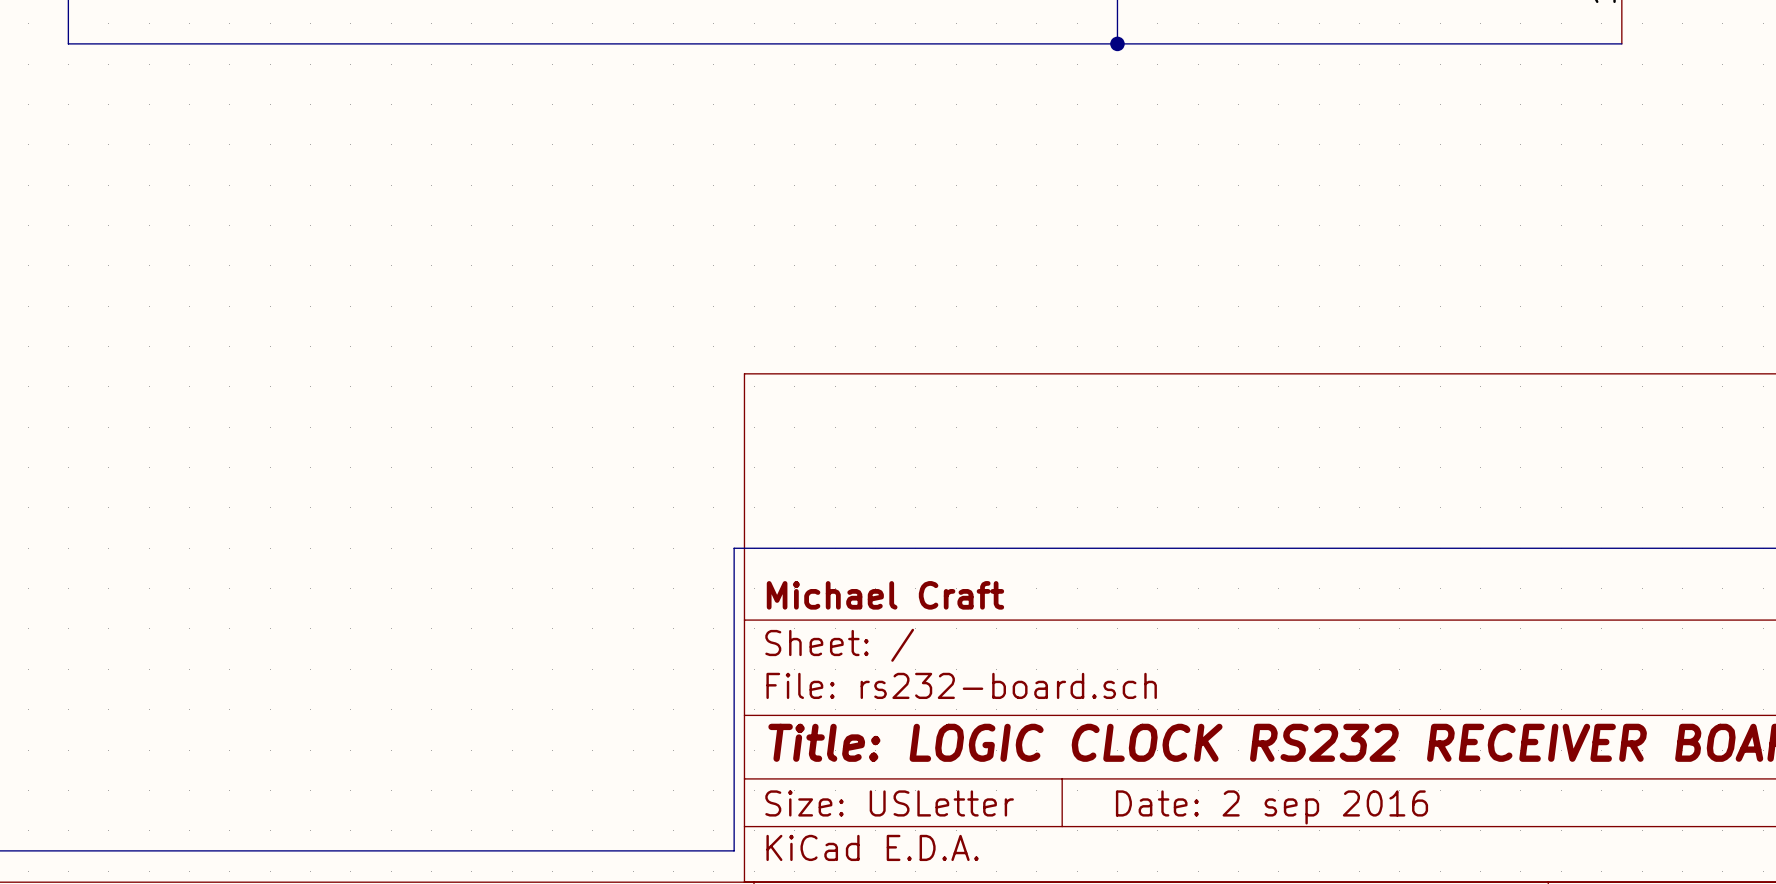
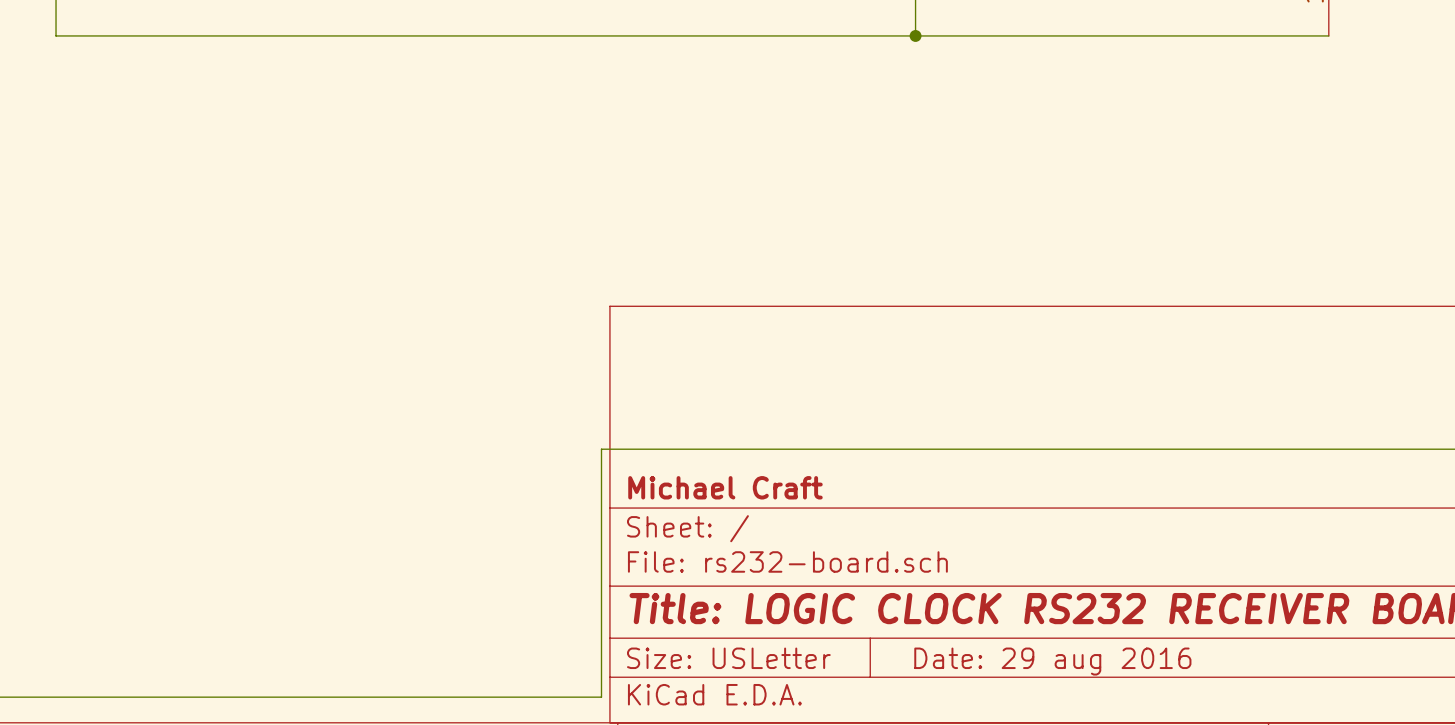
title block: Date: 2 sep 2016 (1271, 807) -> Date: 29 aug 2016 (1052, 661)

